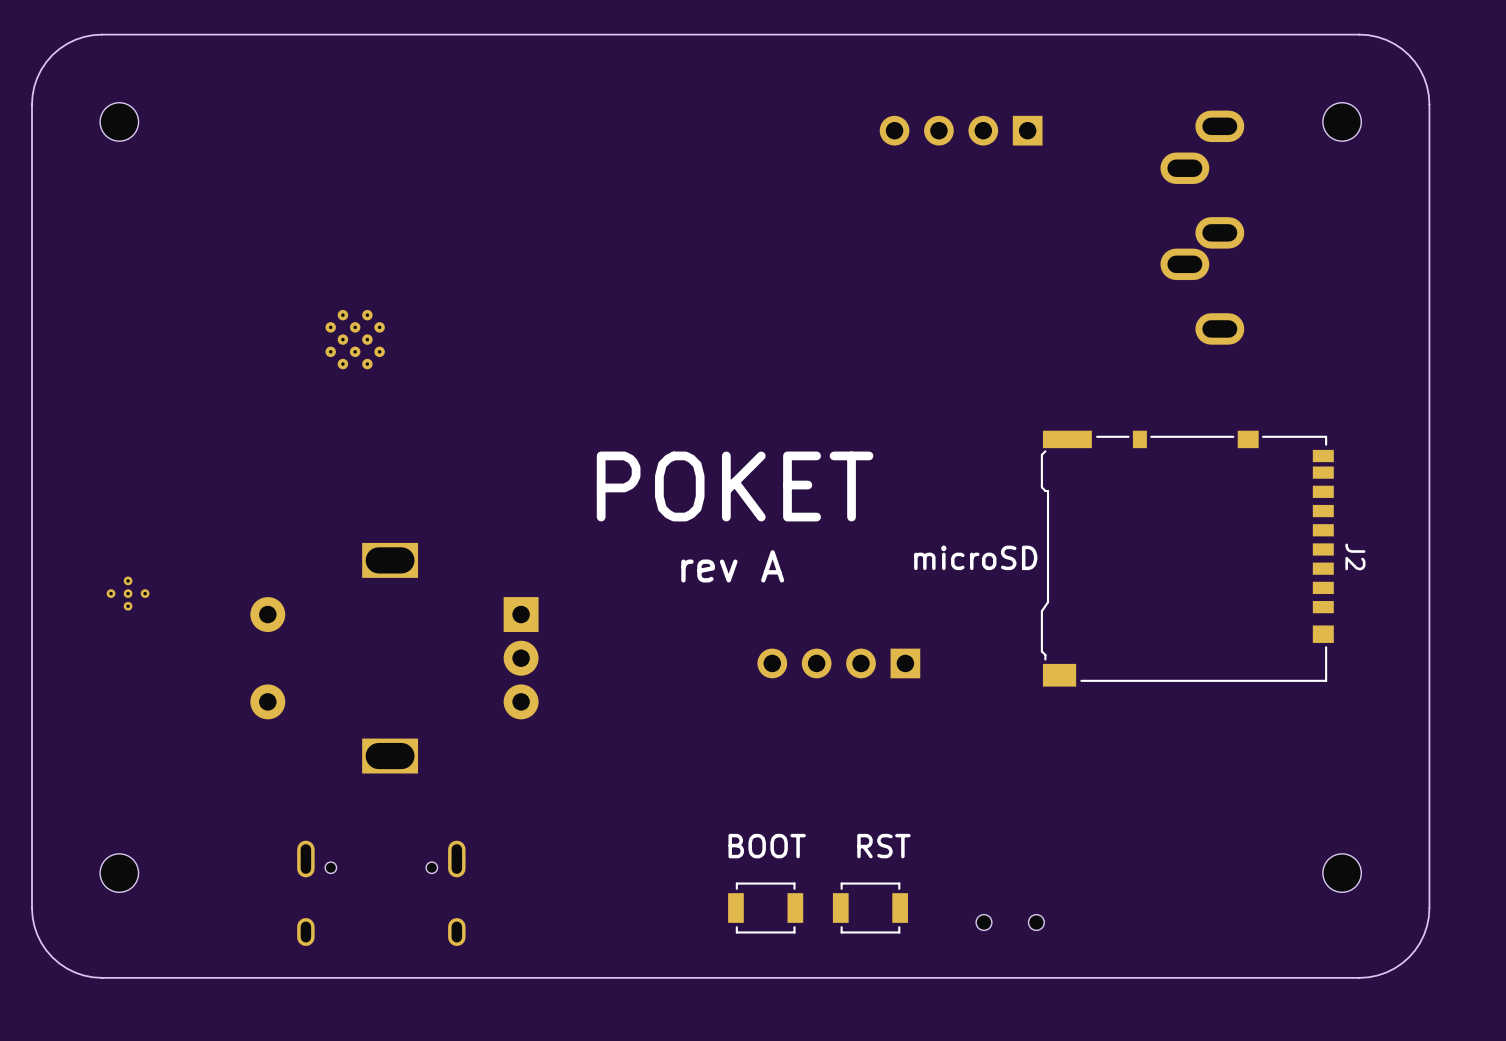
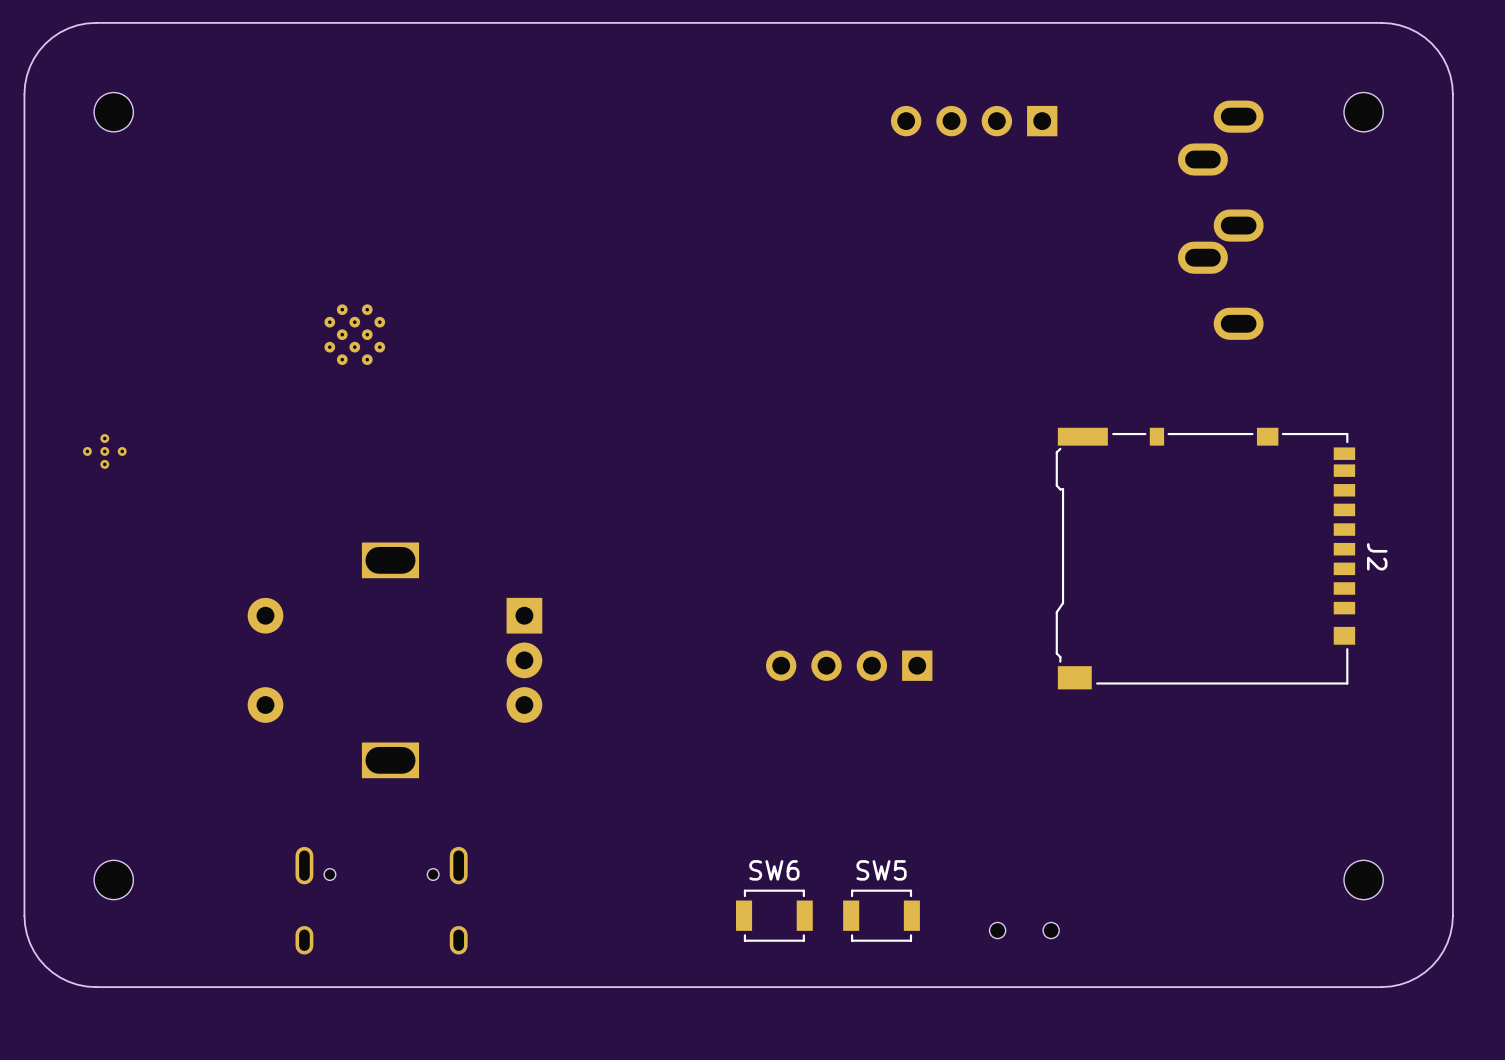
text: POKET (735, 486) -> none
text: microSD (975, 557) -> none
text: rev A (732, 566) -> none
part position: (128, 593) -> (104, 451)
text: BOOT RST (819, 846) -> none
SW6 name: none -> SW6 (774, 870)
SW5 name: none -> SW5 (881, 870)

